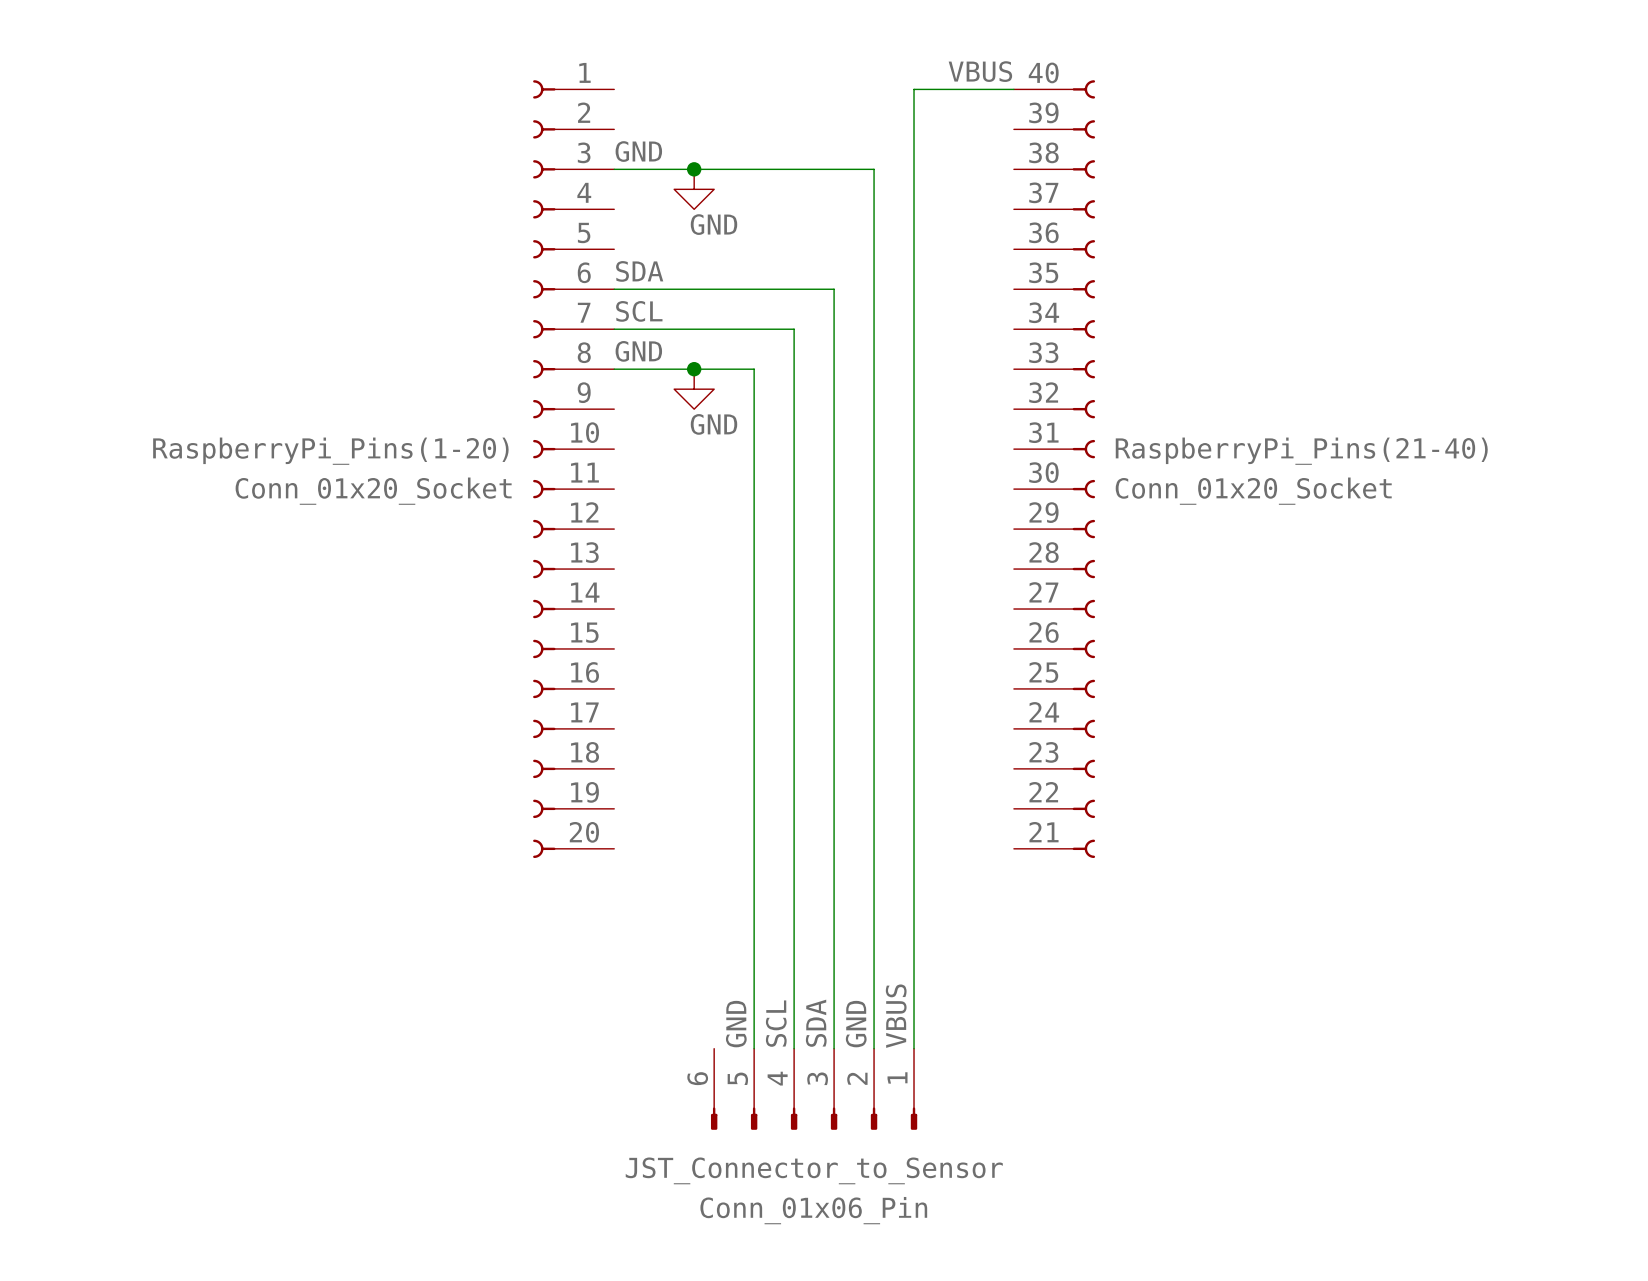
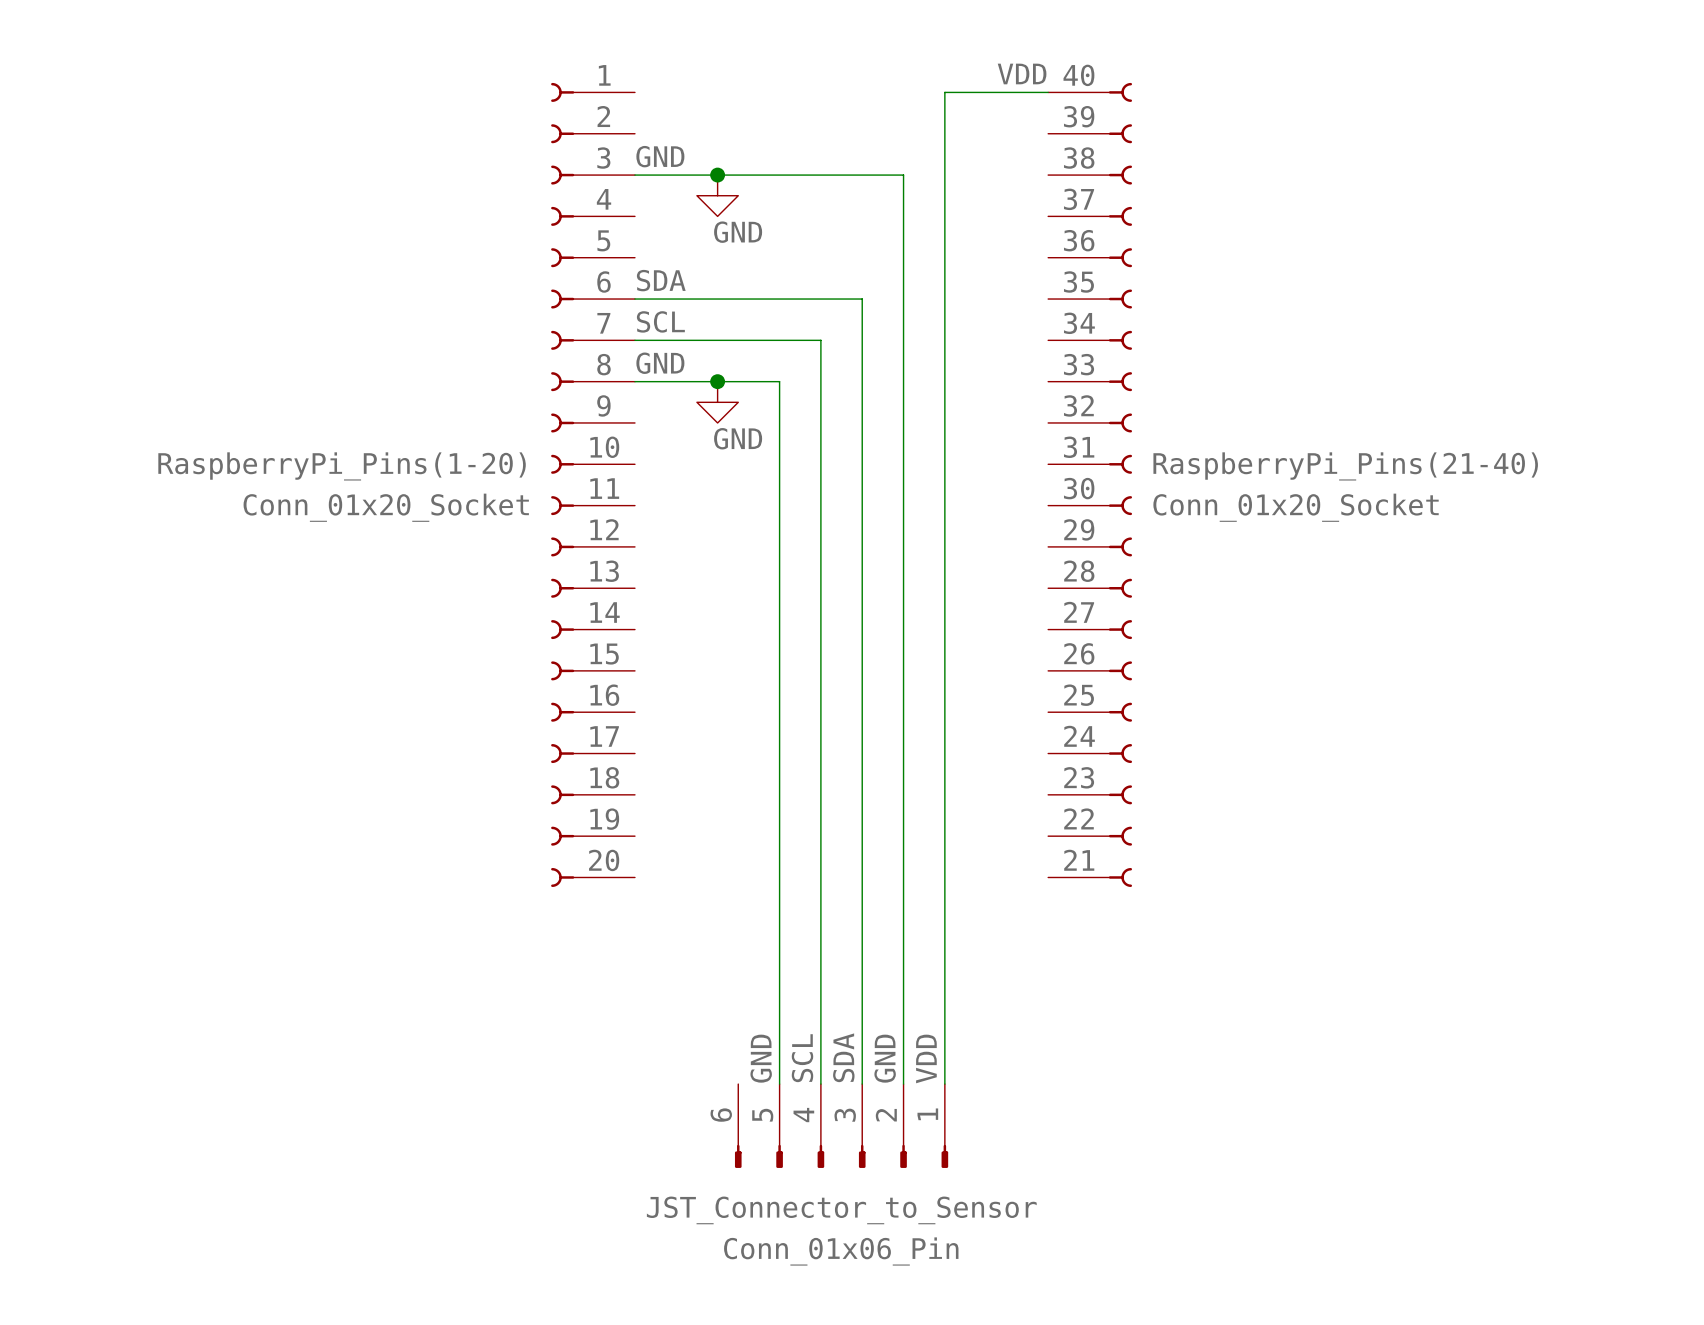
label: VBUS (980, 71) -> VDD (1022, 73)
label: VBUS (896, 1016) -> VDD (926, 1058)

